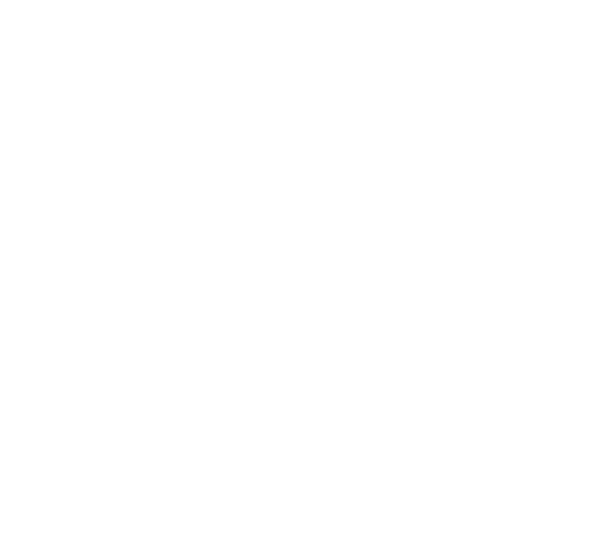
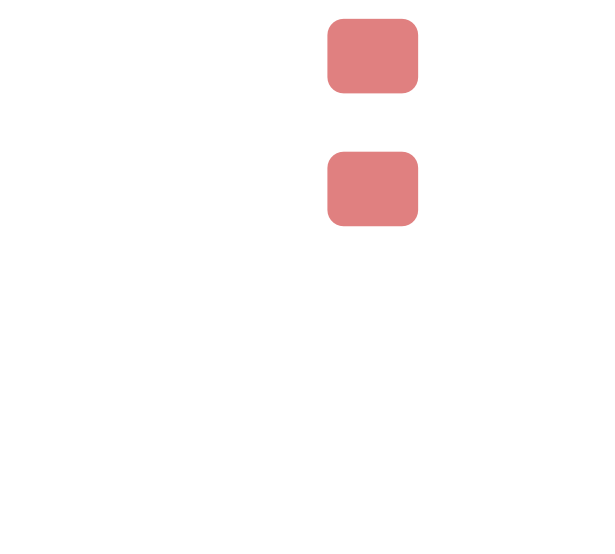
part: none -> (372, 122)

